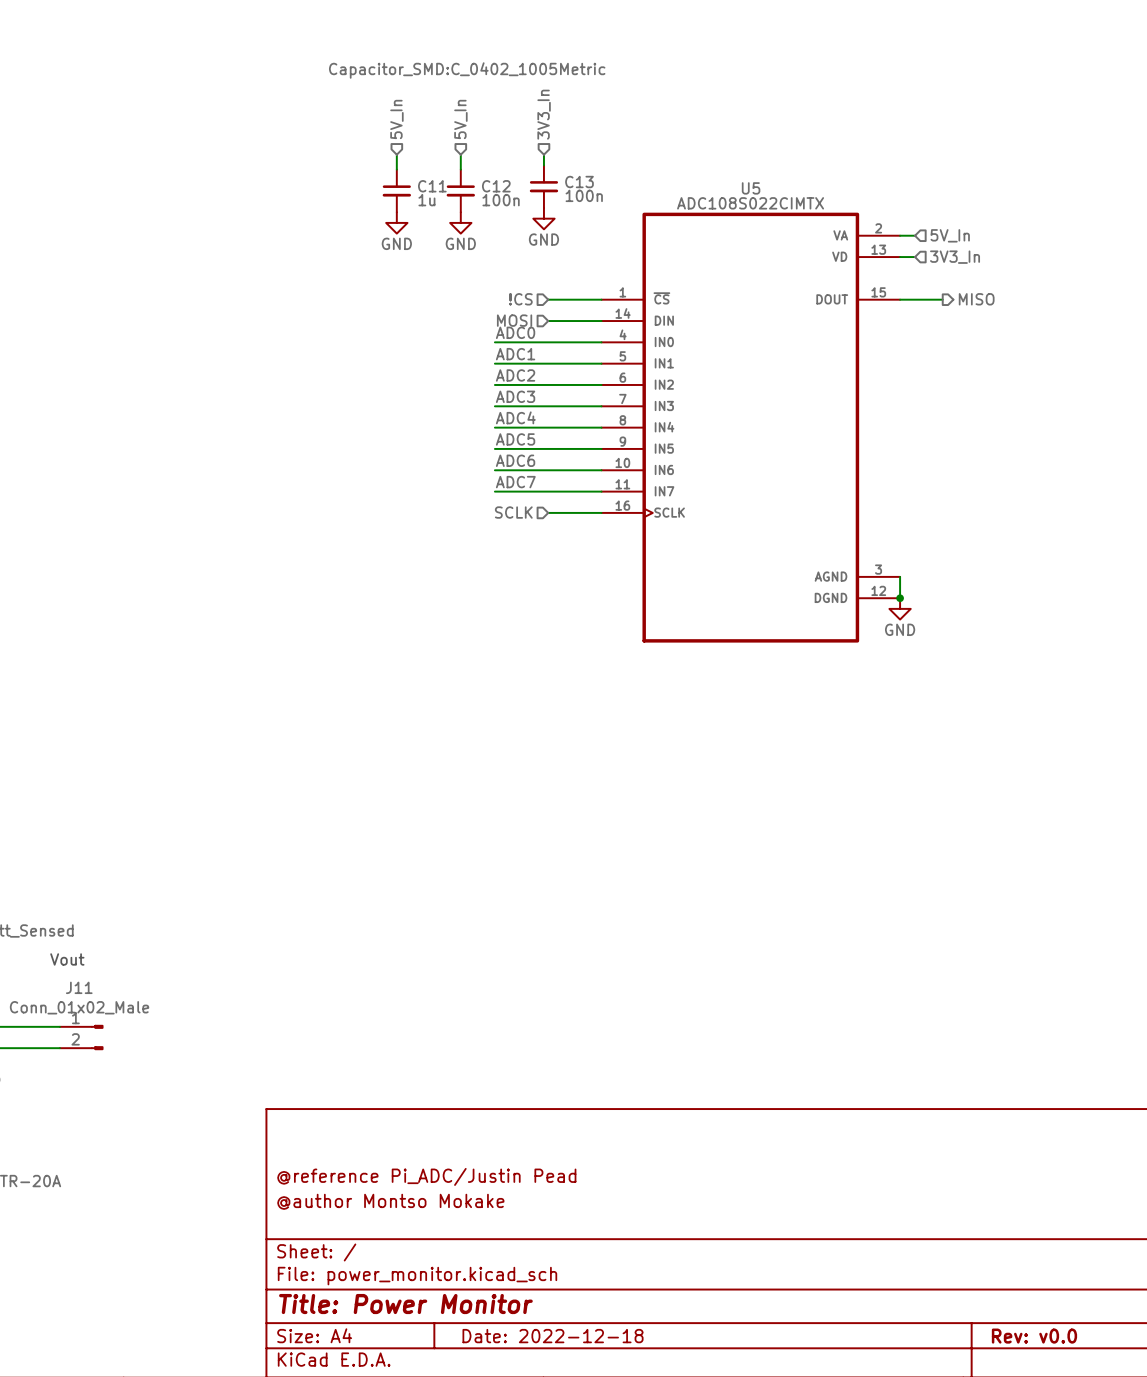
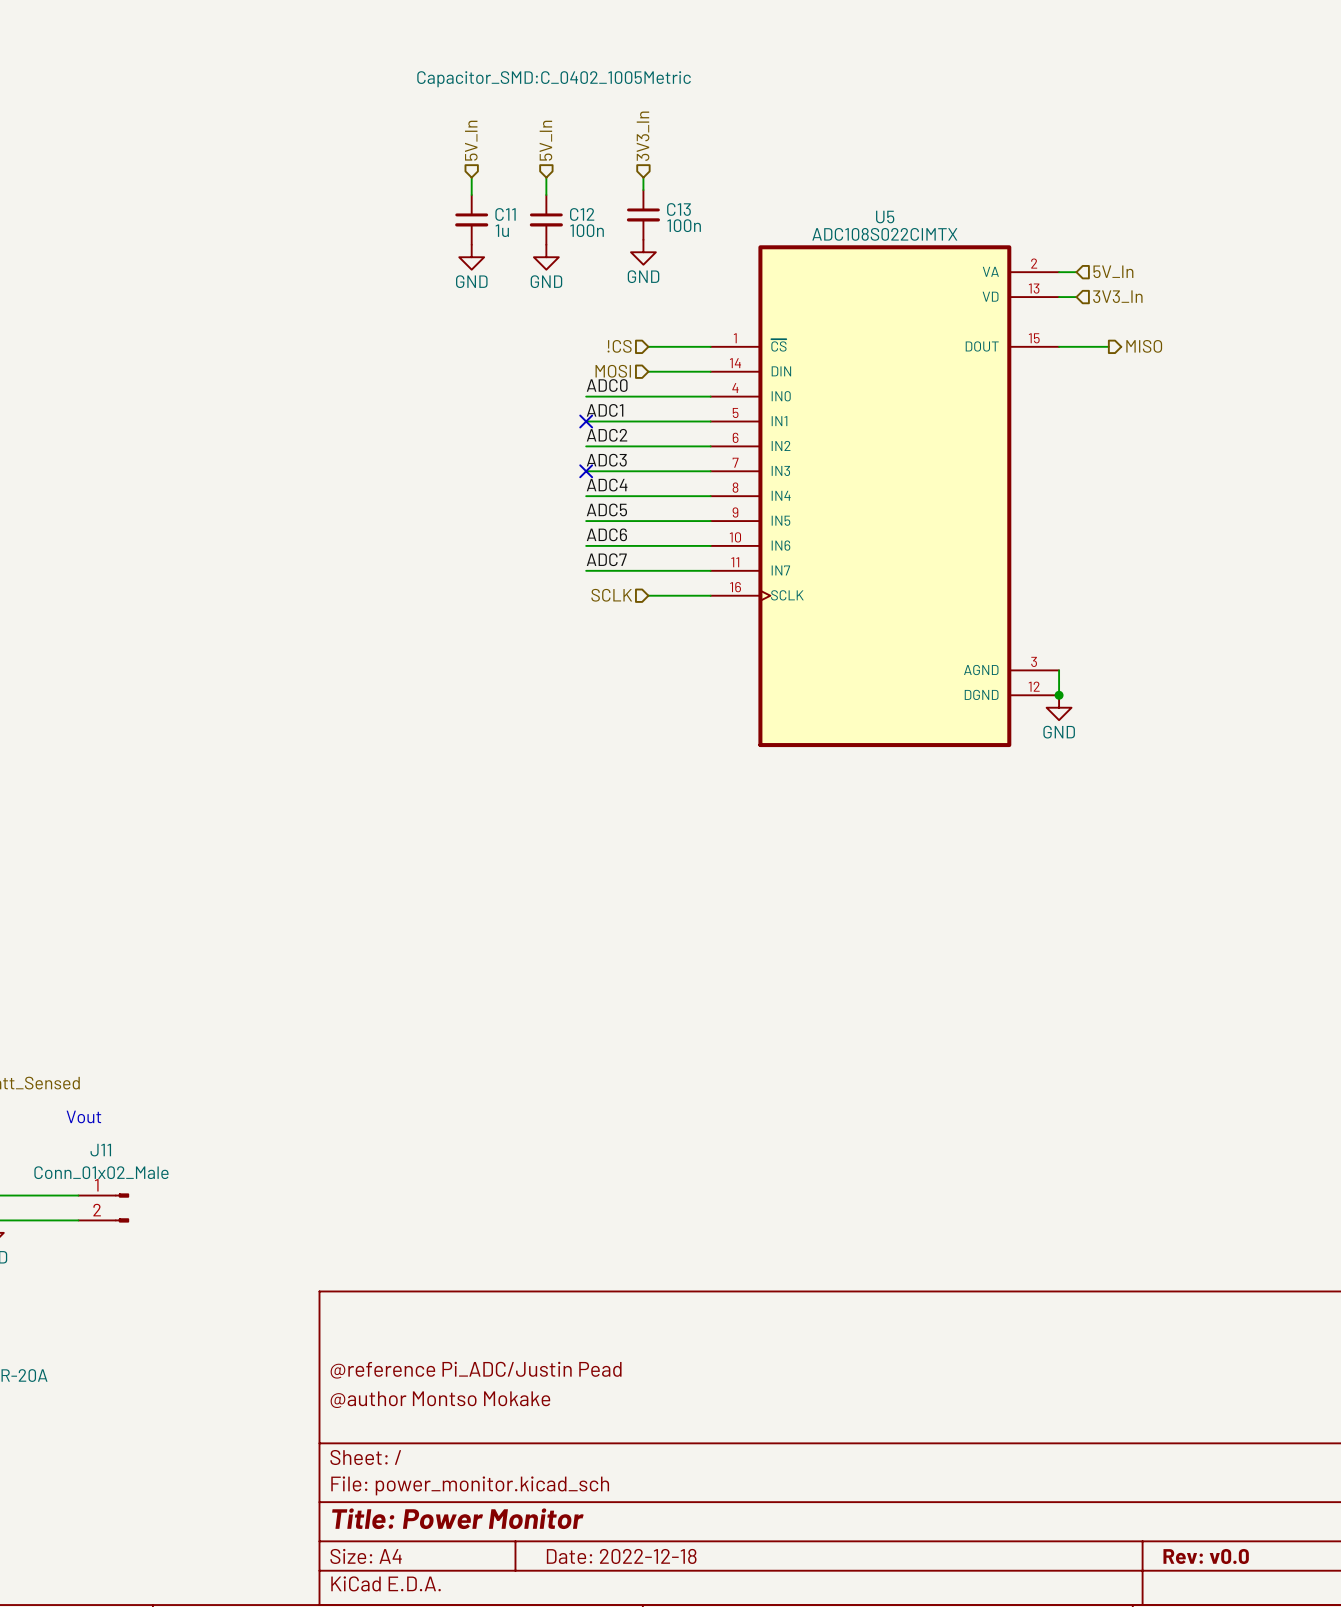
no-connect mark: none -> (586, 421)
no-connect mark: none -> (586, 471)

